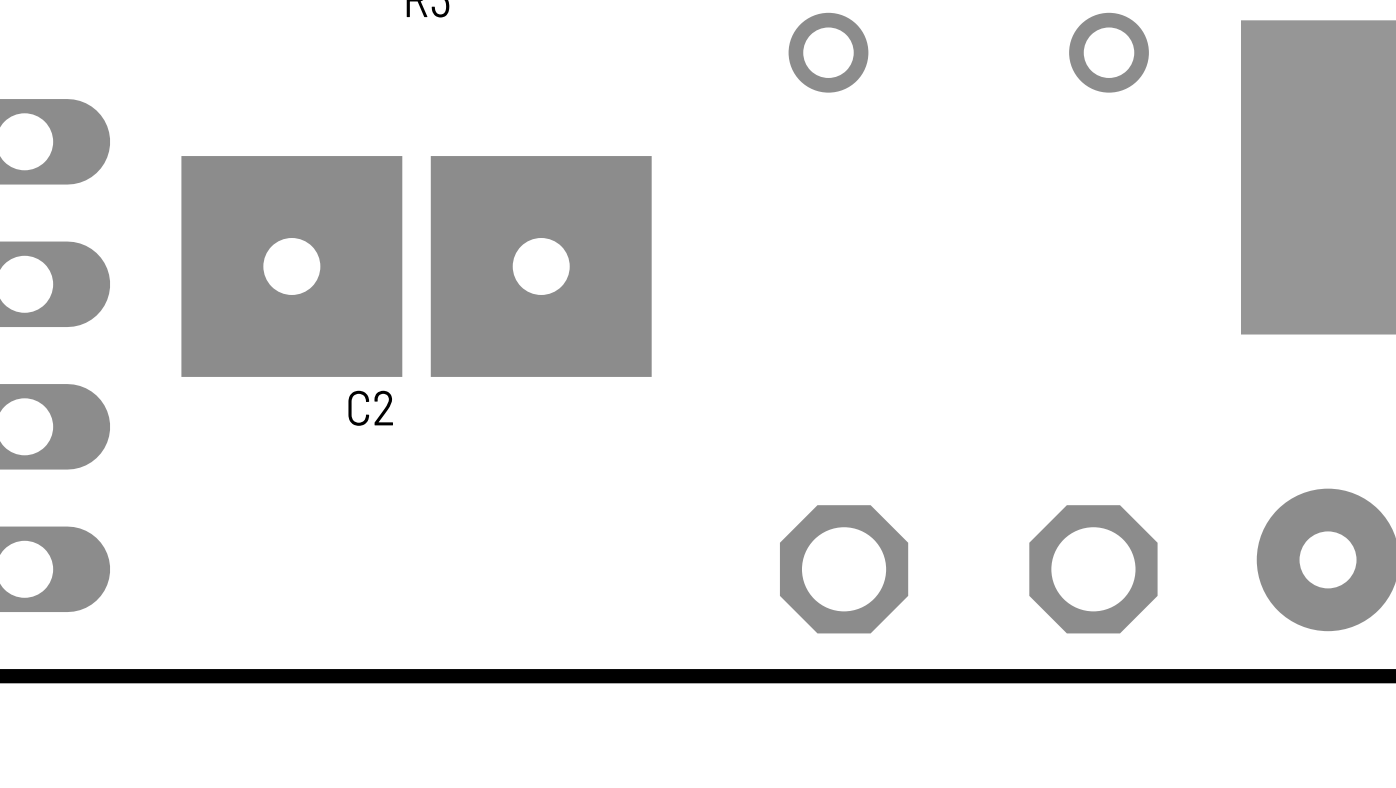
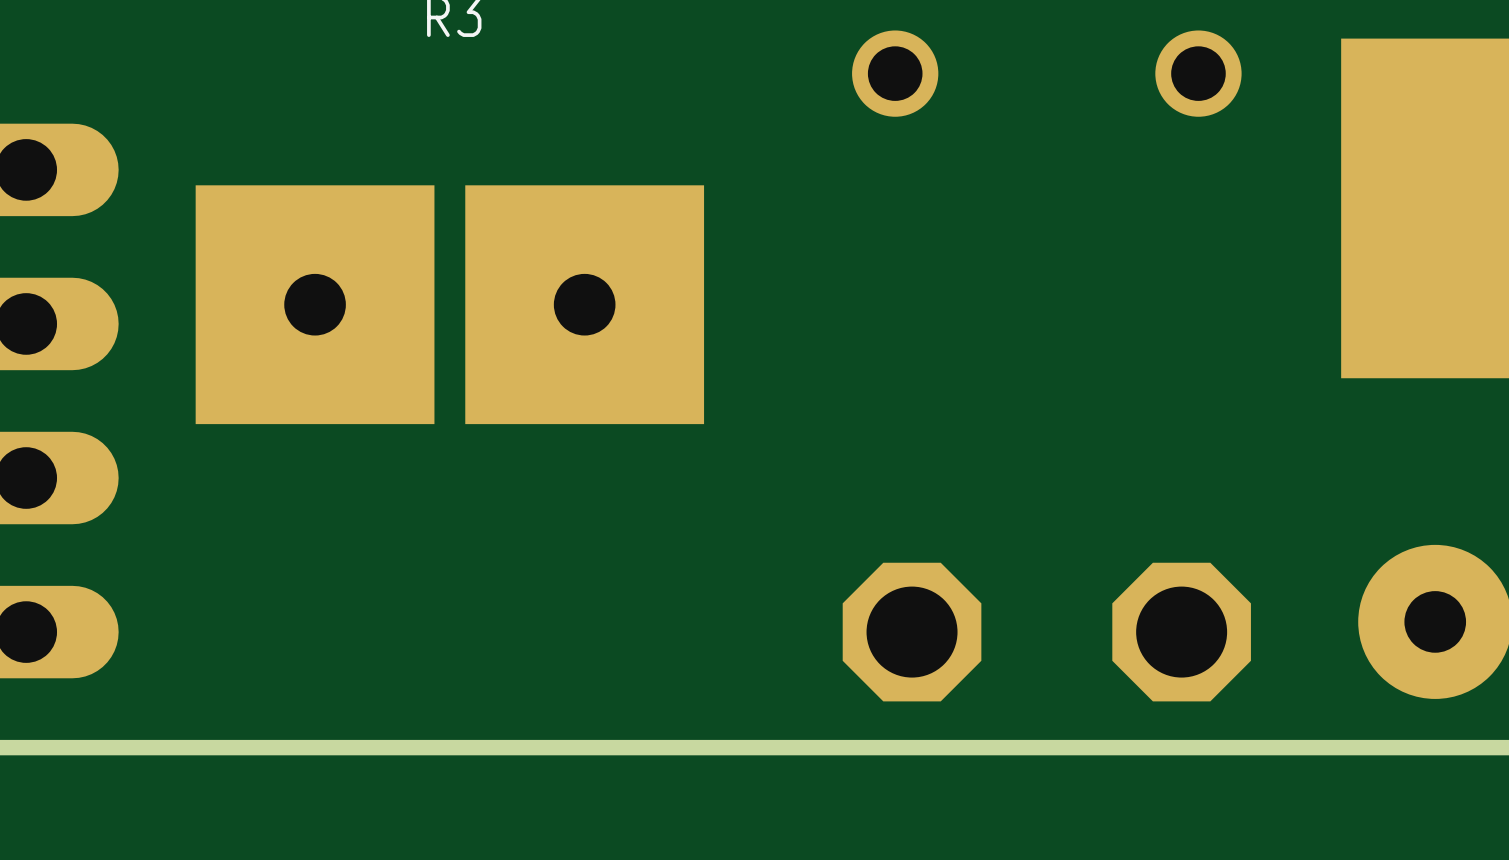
text: C2 (370, 408) -> none

